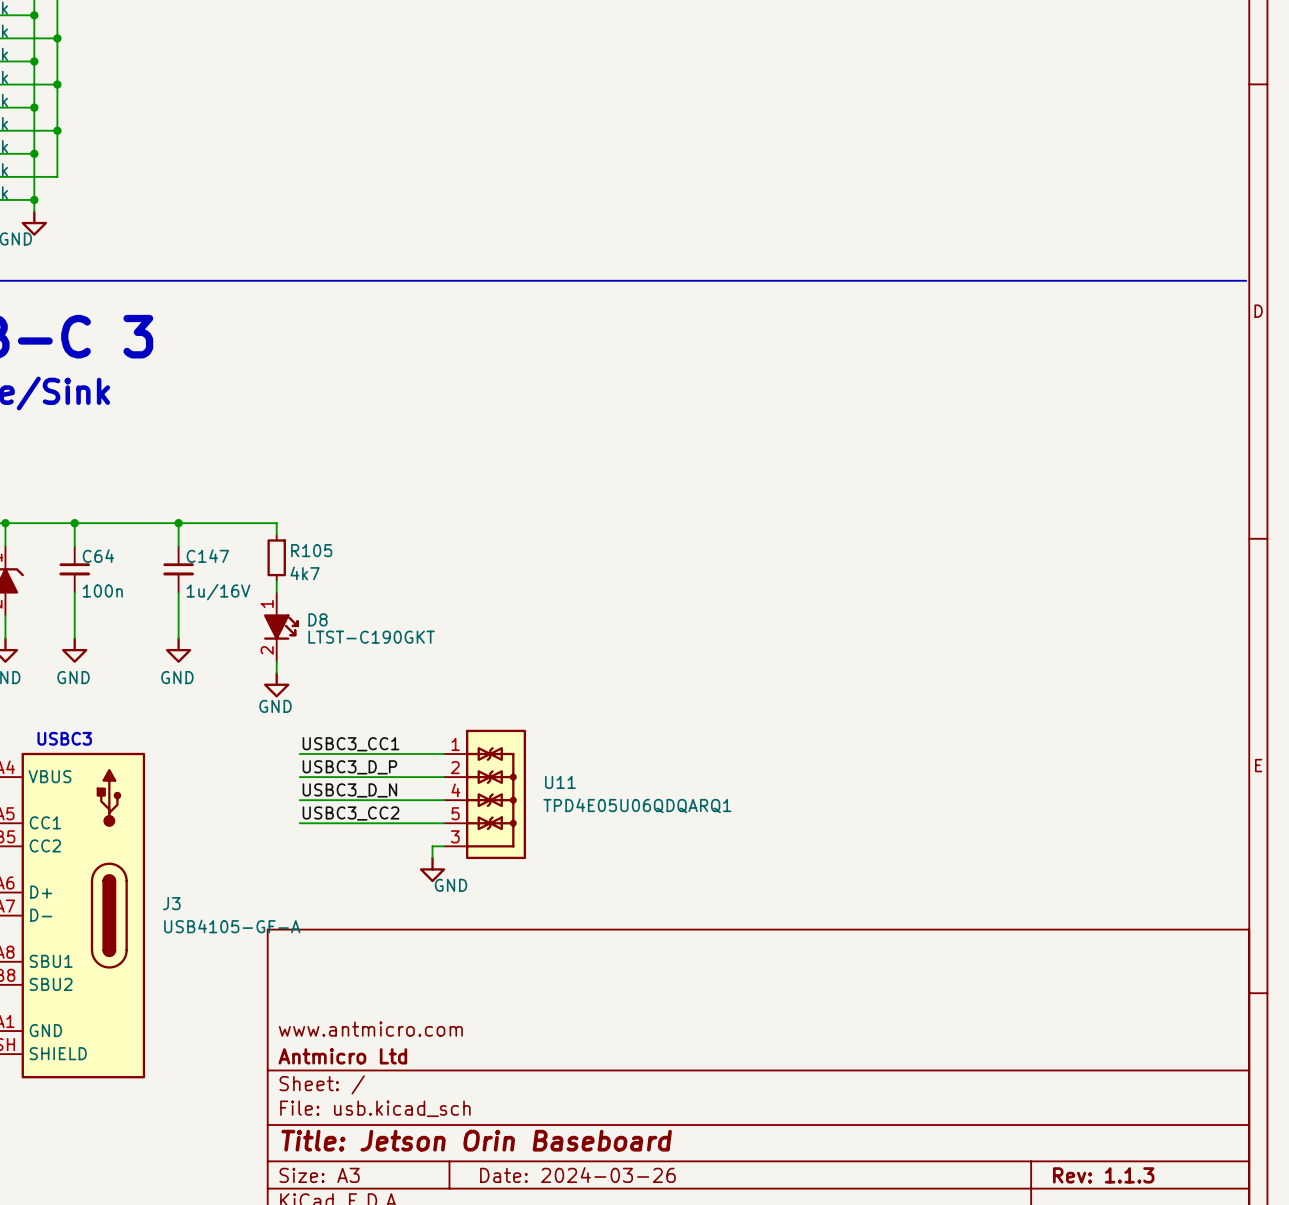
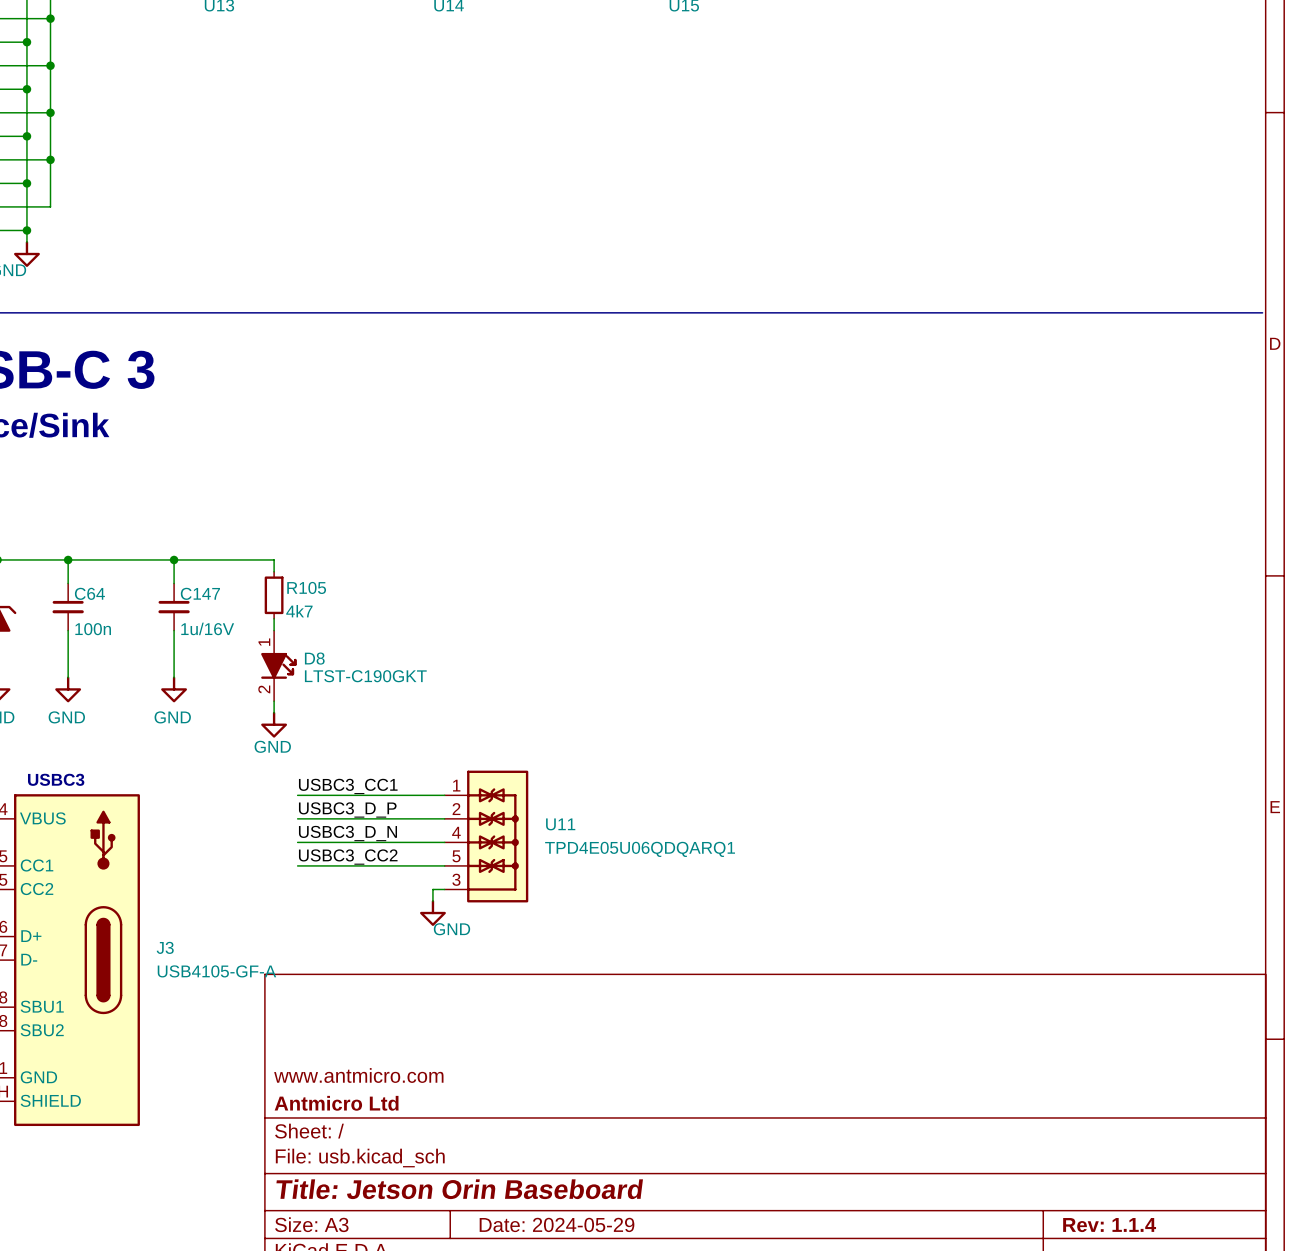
title block: Date: 2024-03-26 (577, 1175) -> Date: 2024-05-29 (557, 1224)
title block: Rev: 1.1.3 (1103, 1175) -> Rev: 1.1.4 (1109, 1225)

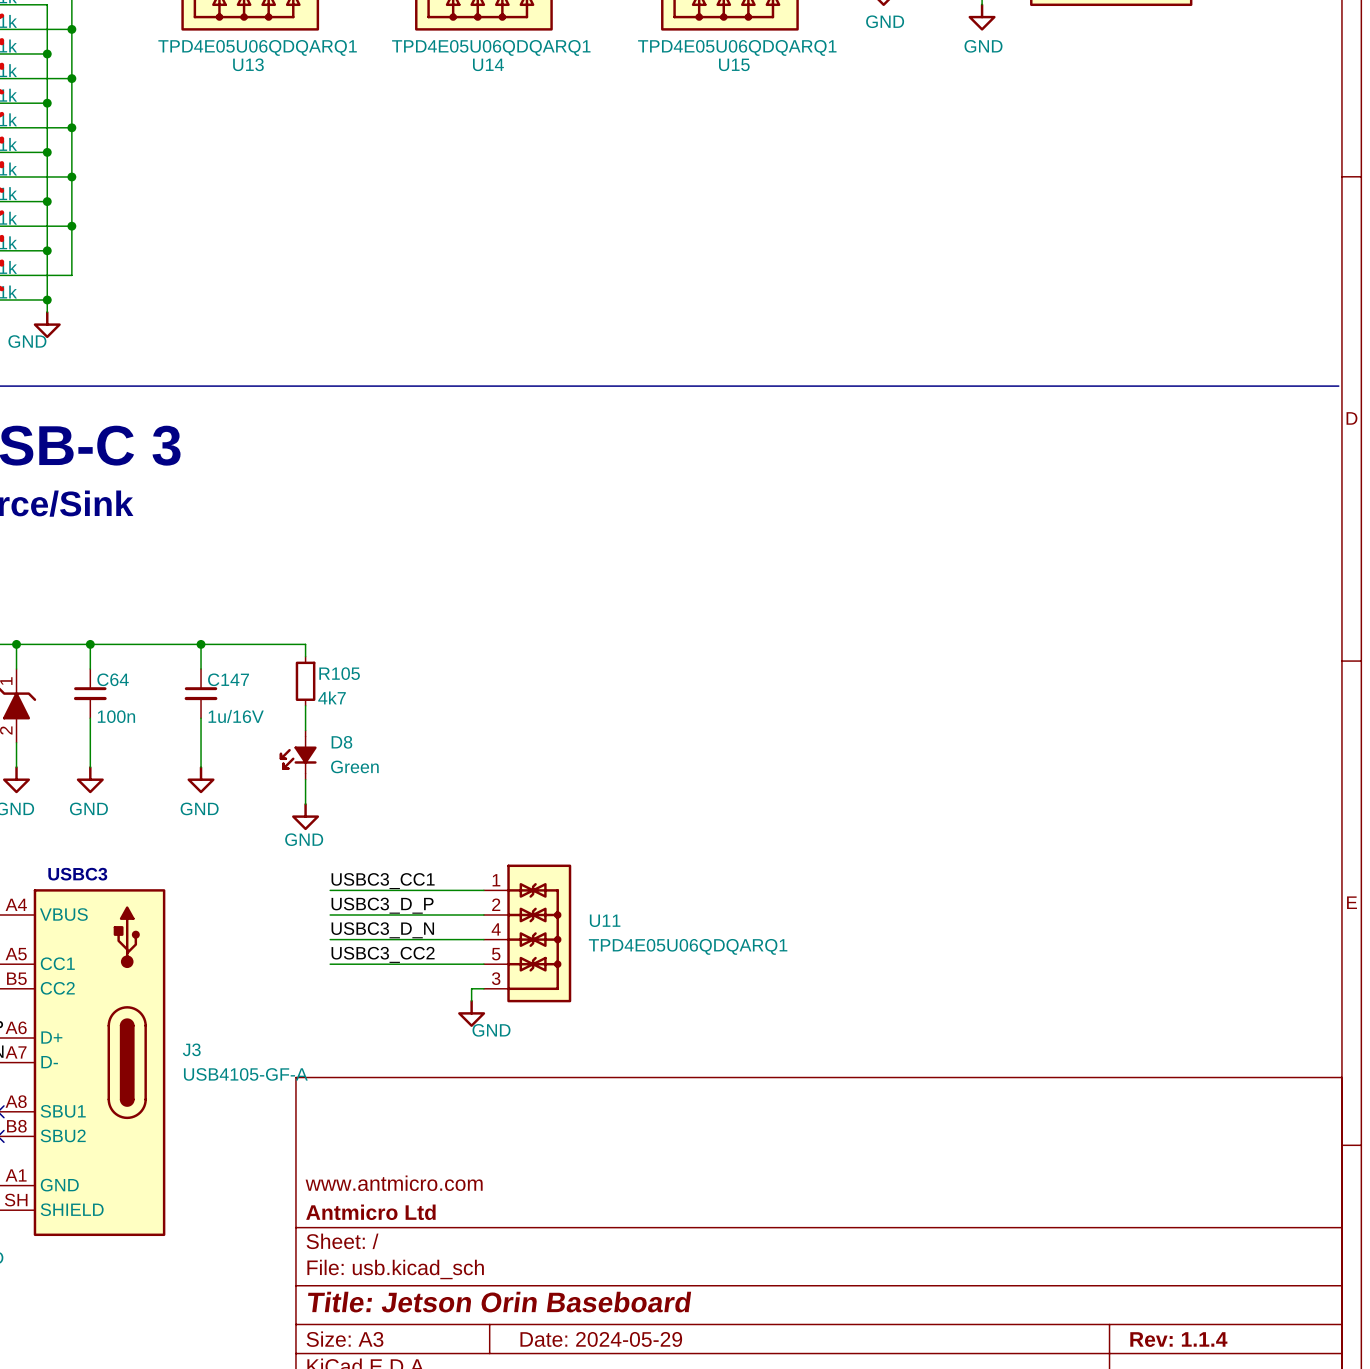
D8 symbol: [261, 630, 297, 702] -> [279, 730, 317, 780]
D8 text: LTST-C190GKT (365, 676) -> none
D8 text: none -> Green (354, 766)

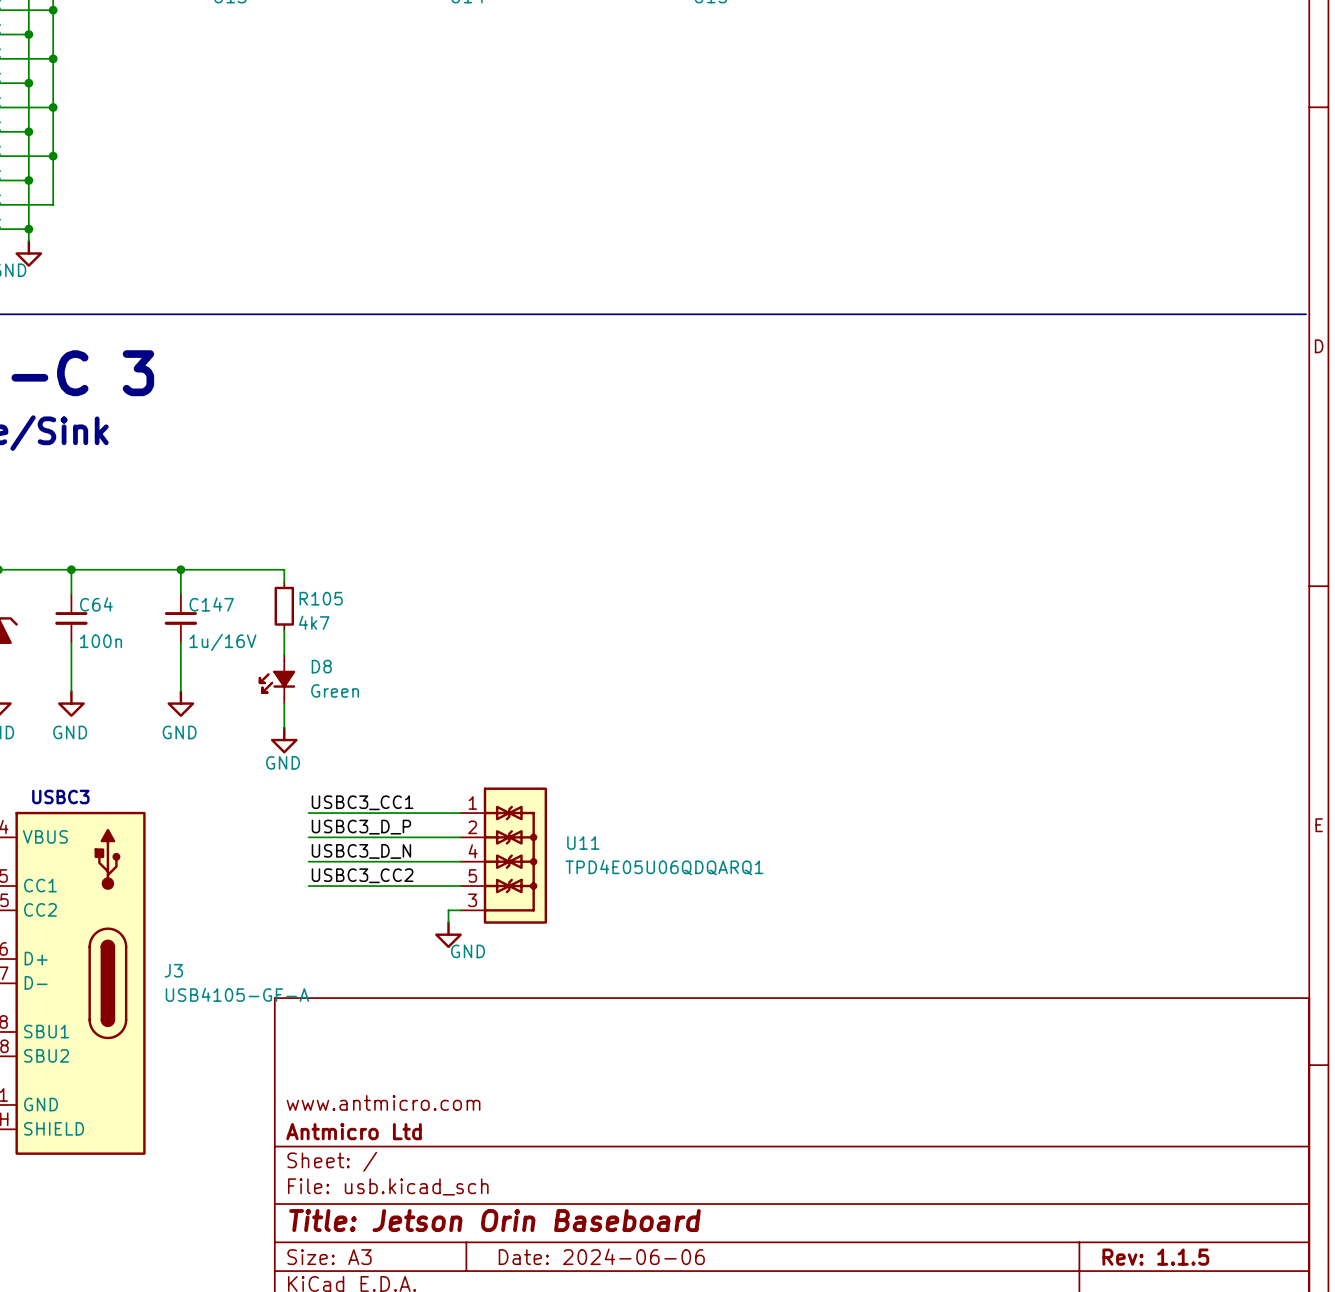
title block: Date: 2024-05-29 (601, 1339) -> Date: 2024-06-06 (601, 1256)
title block: Rev: 1.1.4 (1178, 1339) -> Rev: 1.1.5 (1155, 1257)

